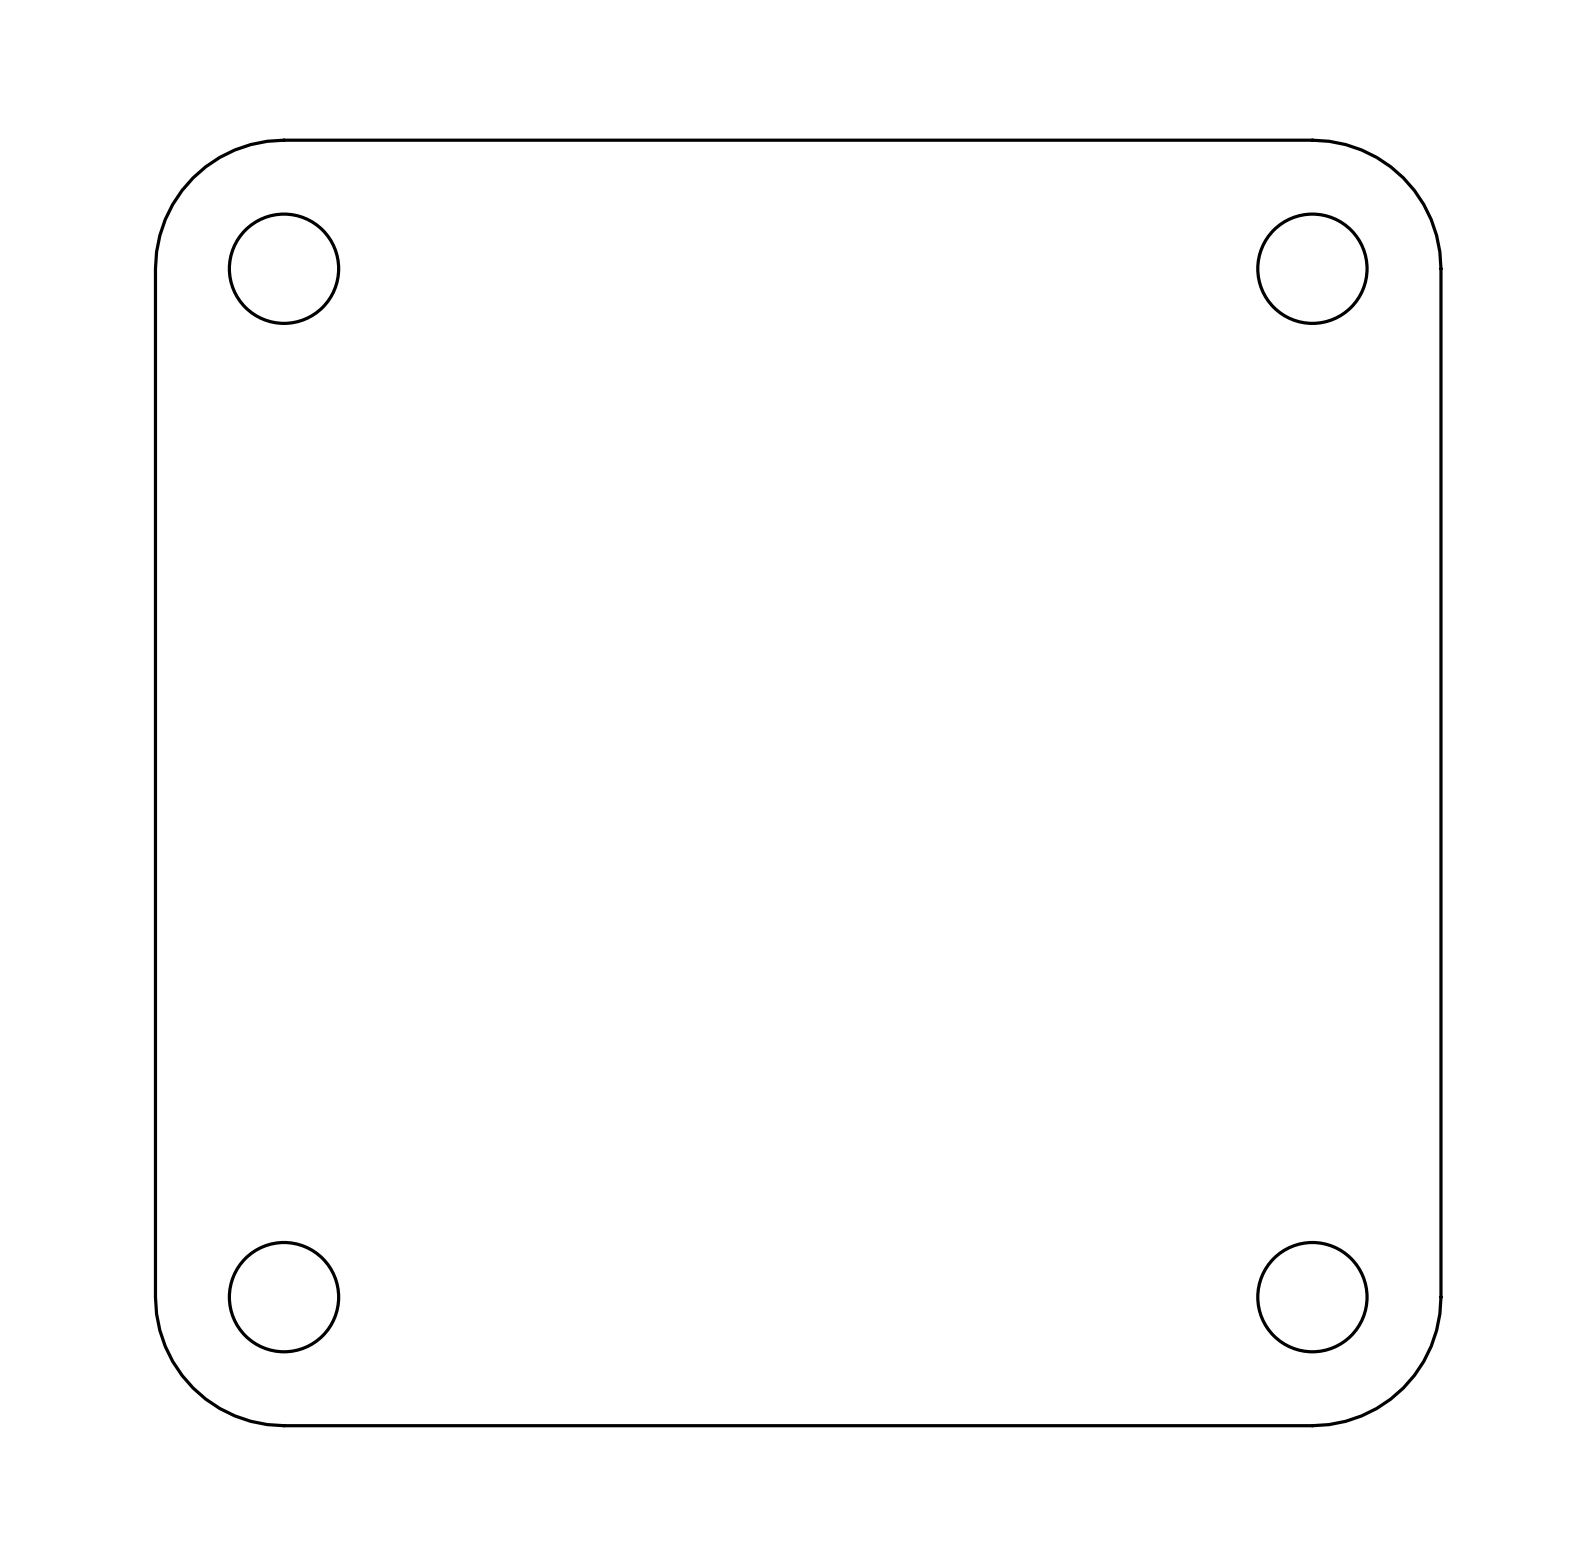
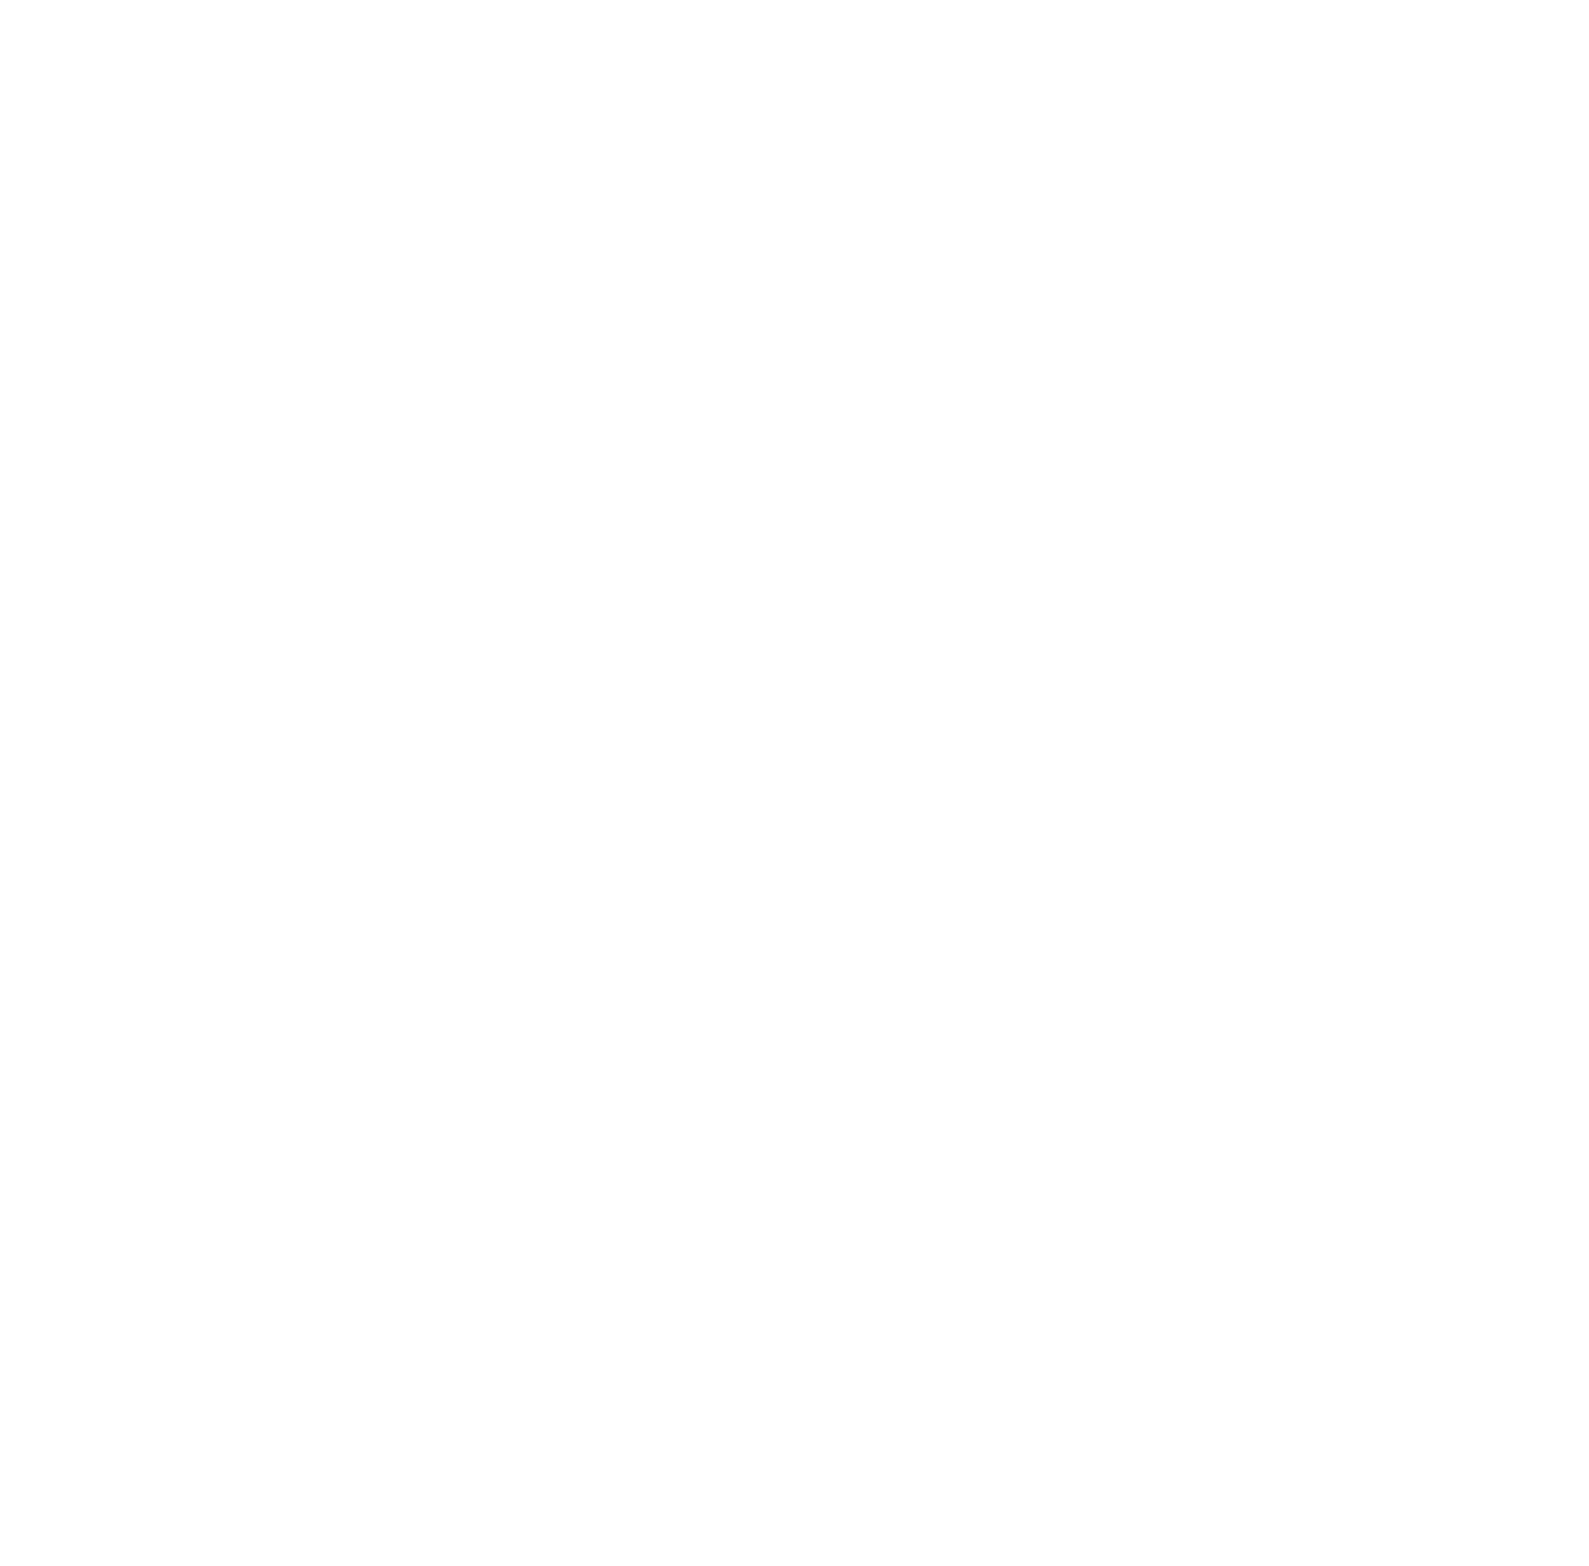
board edge: (1312, 140) (284, 140) (250, 144) (234, 149) (219, 157) (193, 177) (172, 204) (165, 219) (156, 251) (155, 268) (155, 1297) (159, 1330) (165, 1346) (172, 1361) (193, 1388) (205, 1399) (234, 1415) (250, 1421) (284, 1425) (1312, 1425) (1345, 1421) (1361, 1415) (1390, 1399) (1403, 1388) (1414, 1375) (1431, 1346) (1436, 1330) (1440, 1297) (1439, 251) (1431, 219) (1423, 204) (1403, 177) (1390, 166) (1361, 149) (1345, 144) (1312, 140) -> none
round board edge: [227, 212, 341, 325] -> none
round board edge: [1256, 212, 1369, 325] -> none
round board edge: [227, 1240, 341, 1354] -> none
round board edge: [1256, 1240, 1369, 1354] -> none

